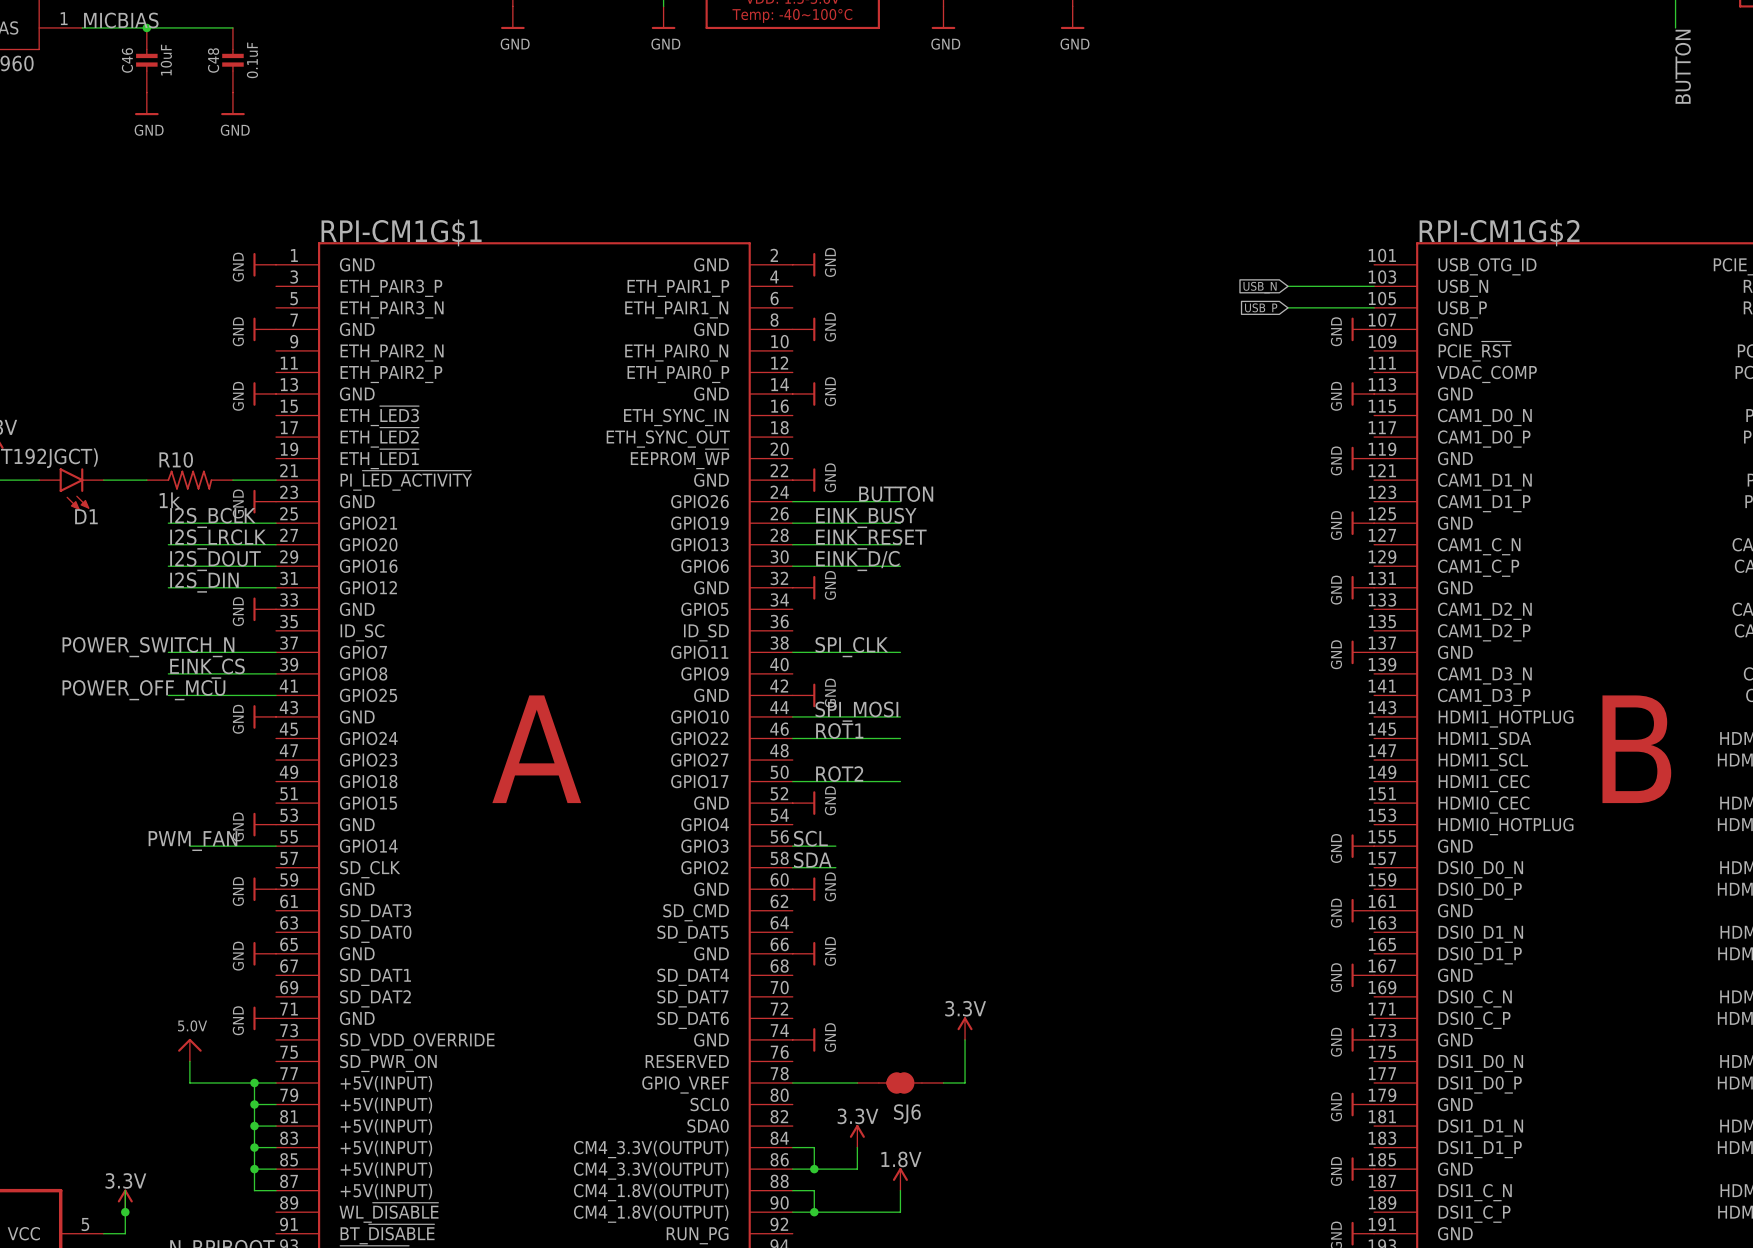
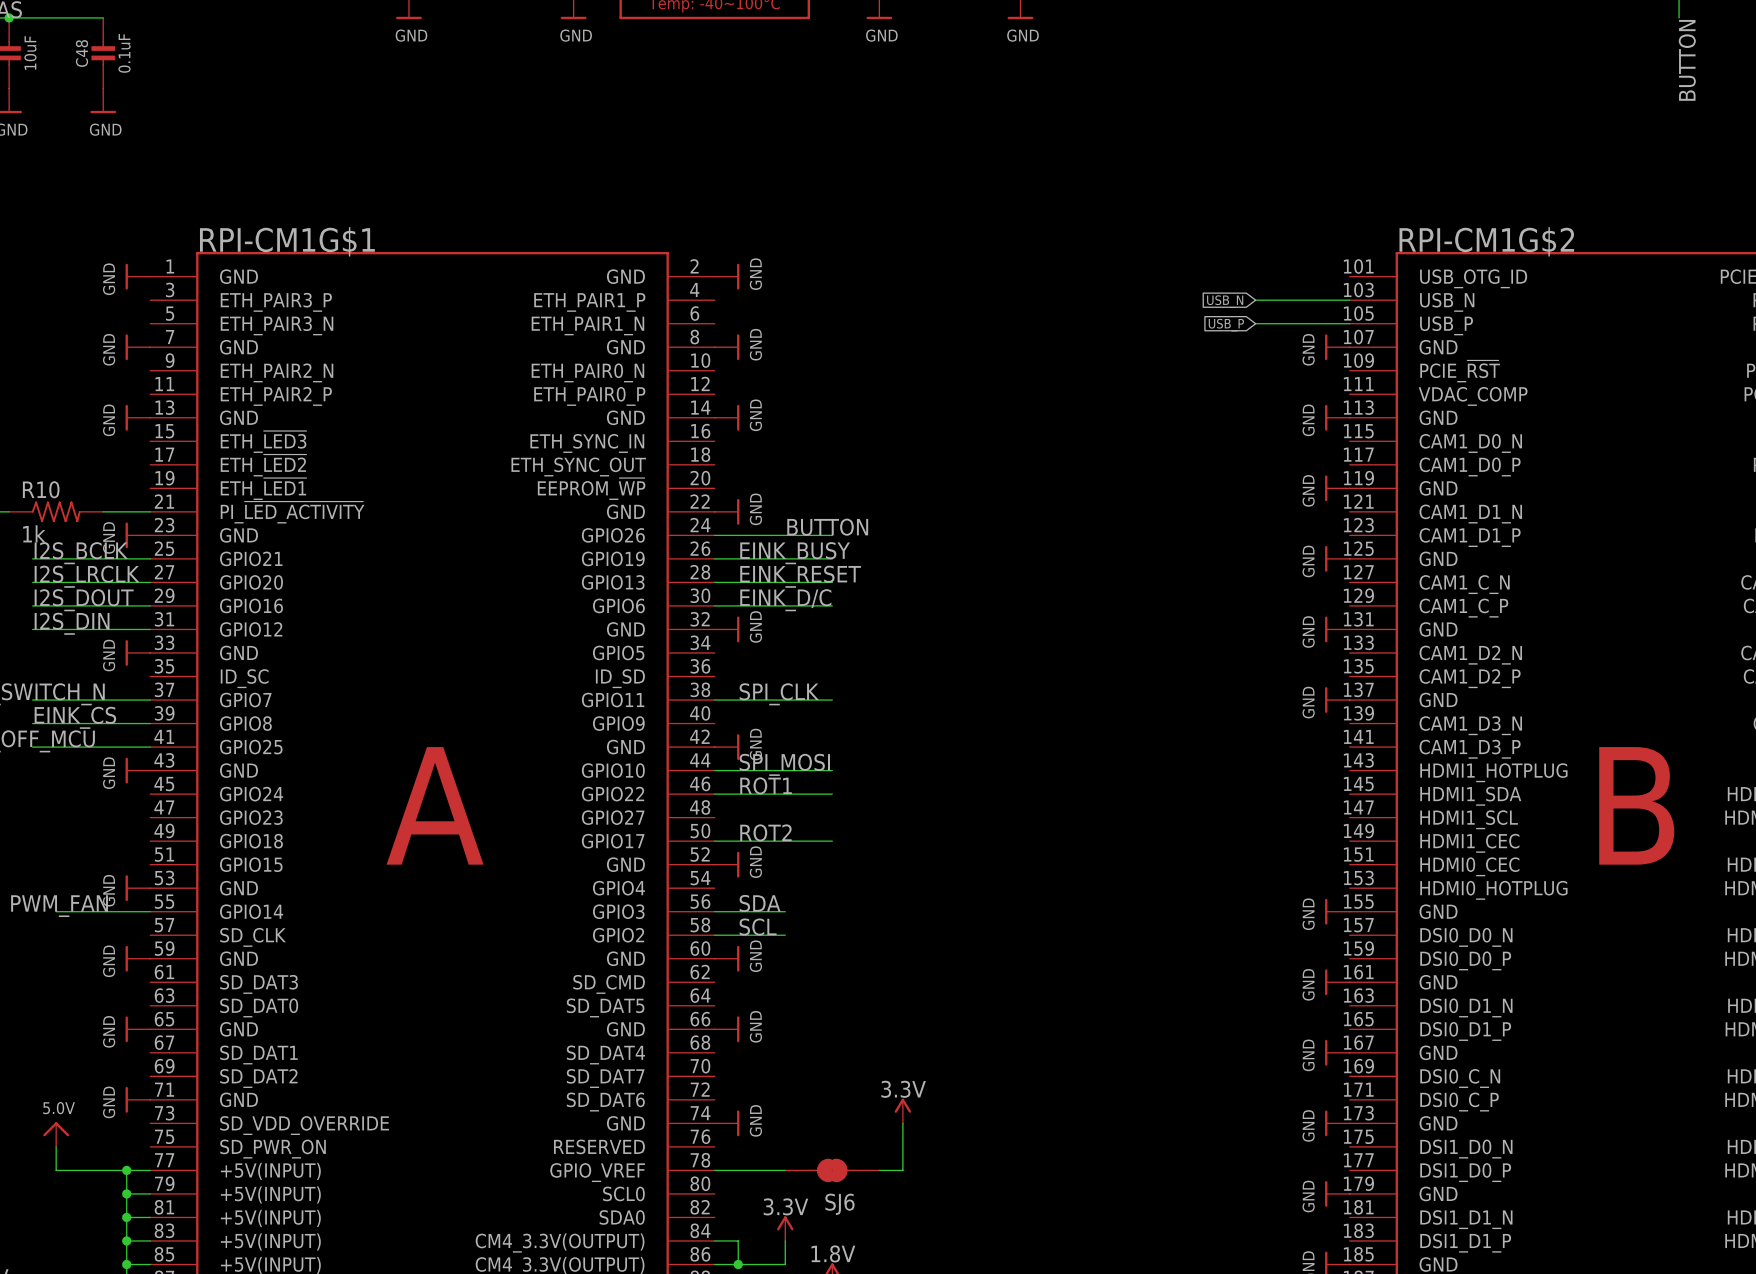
label position: SCL (810, 838) -> SCL (758, 927)
wire: none -> (761, 911) (785, 911)
label position: SDA (812, 860) -> SDA (760, 903)
wire: none -> (761, 935) (785, 935)

